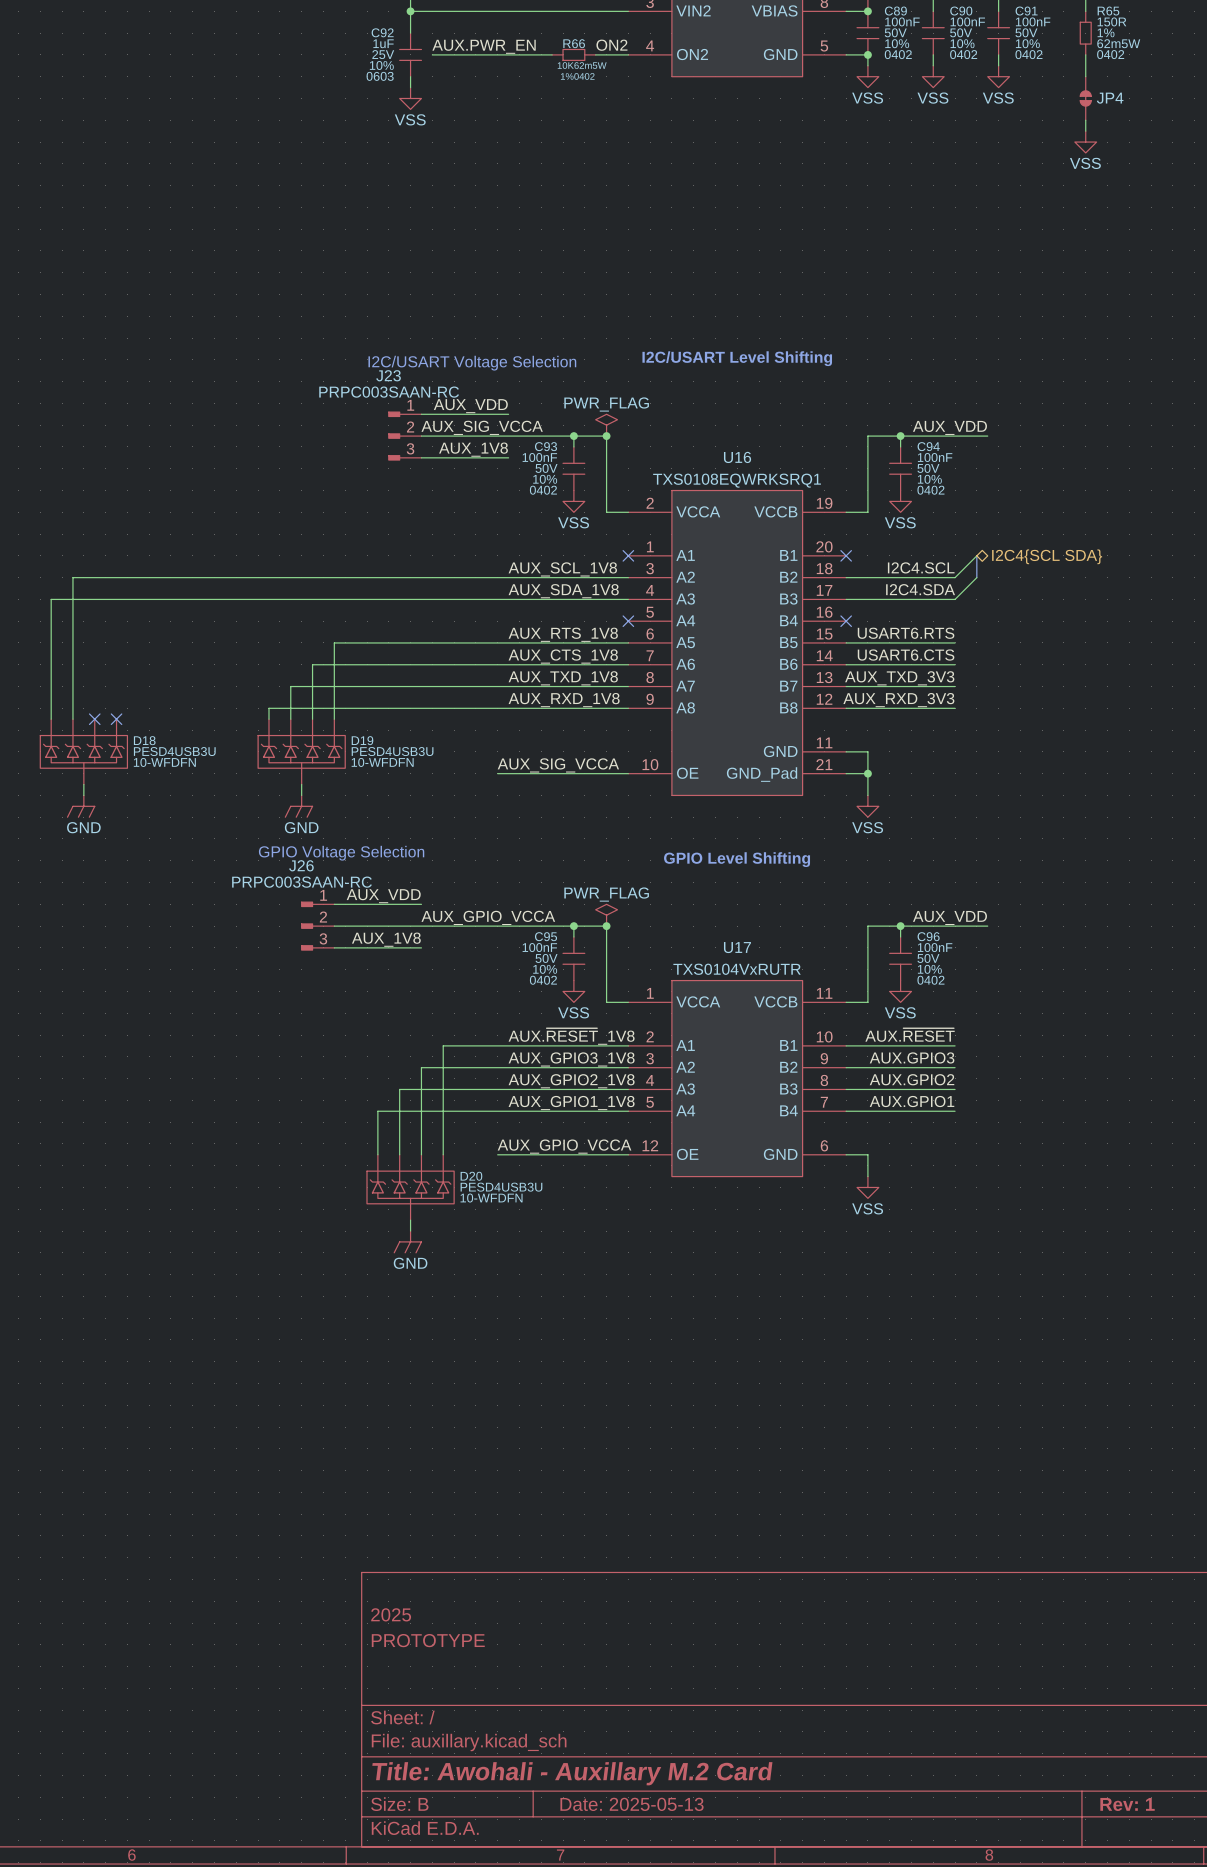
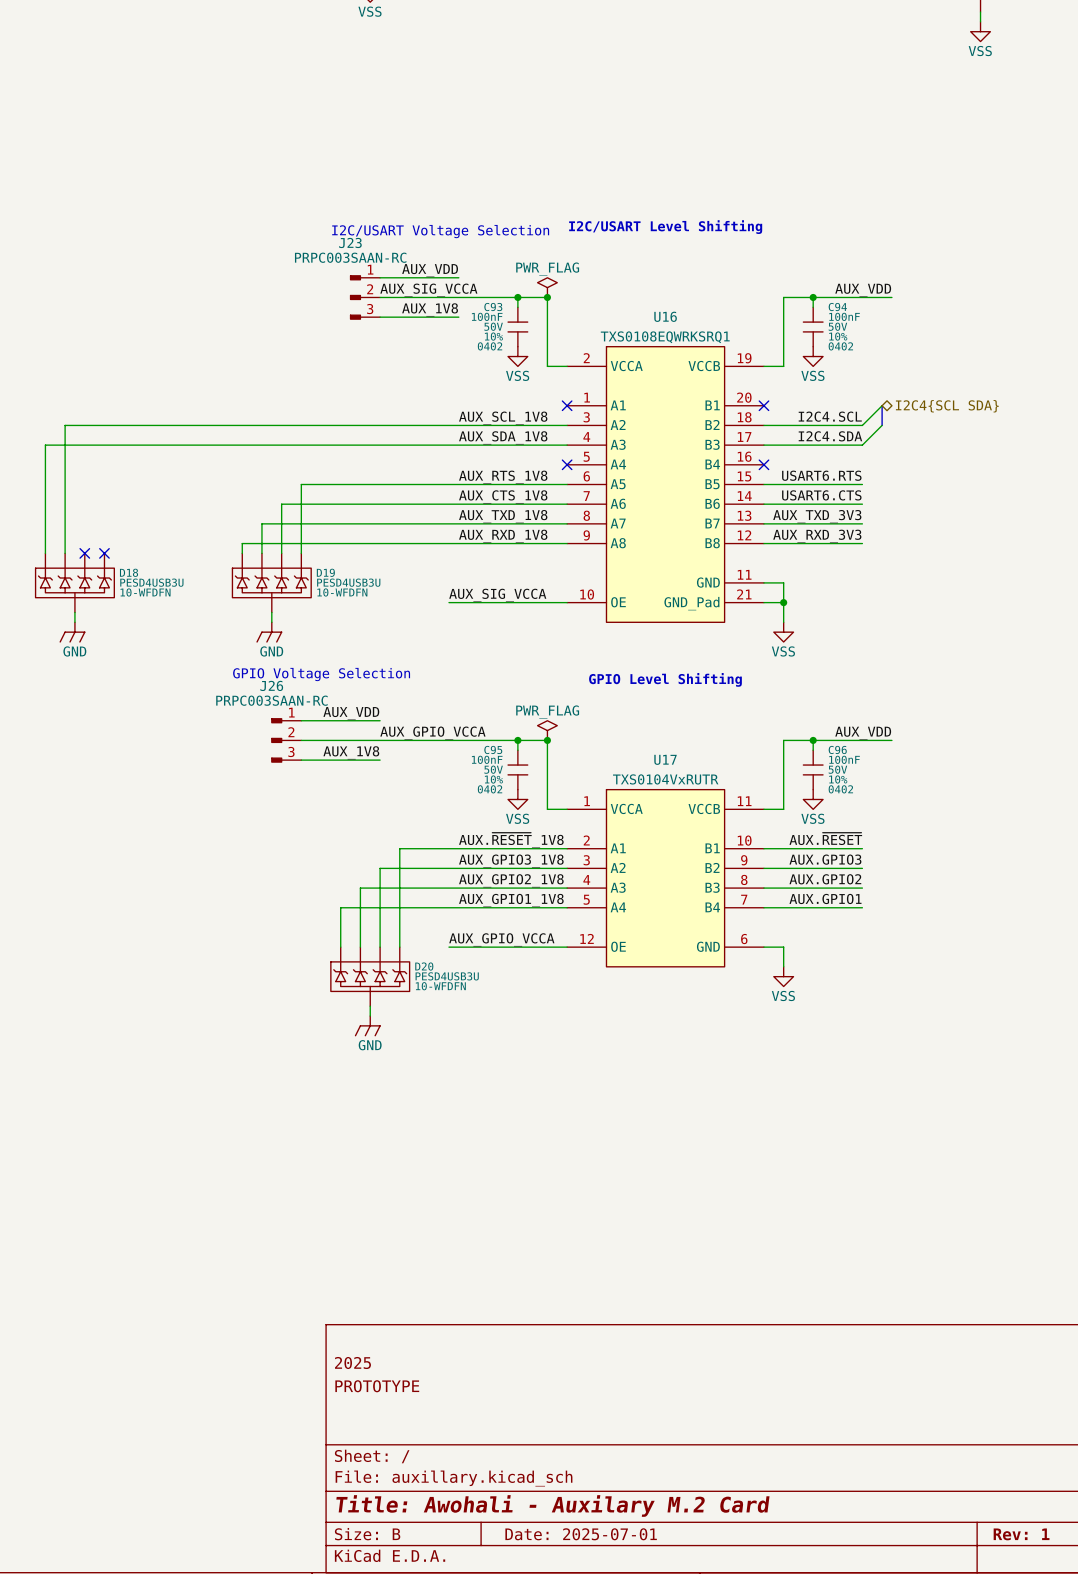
title block: Title: Awohali - Auxillary M.2 Card (572, 1773) -> Title: Awohali - Auxilary M.2 Card (552, 1505)
title block: Date: 2025-05-13 (632, 1804) -> Date: 2025-07-01 (581, 1534)

